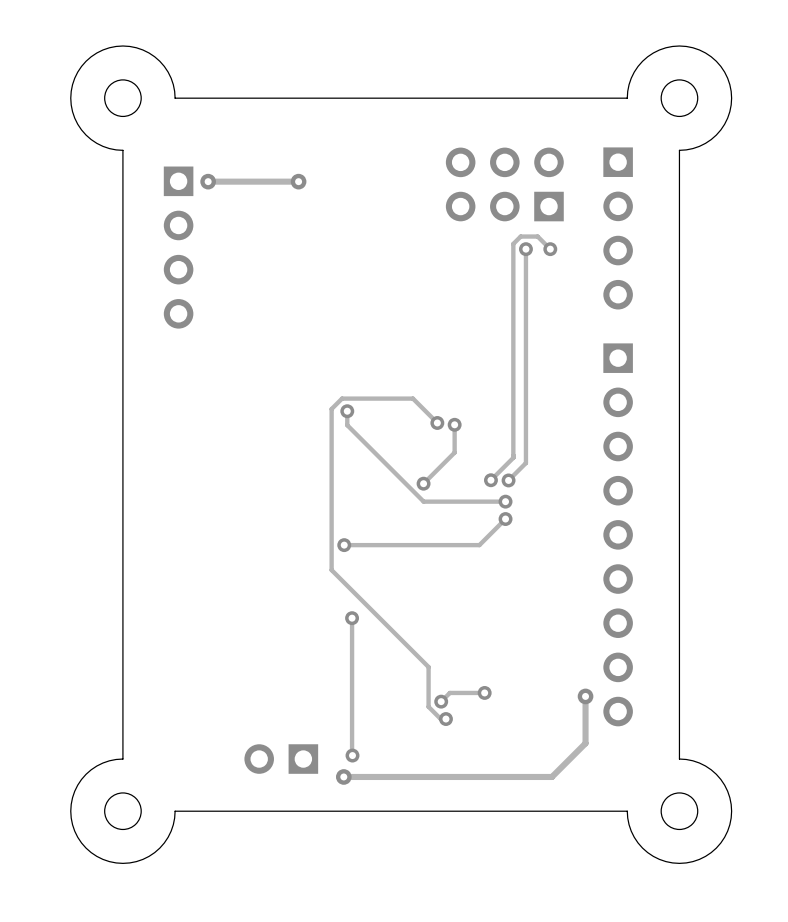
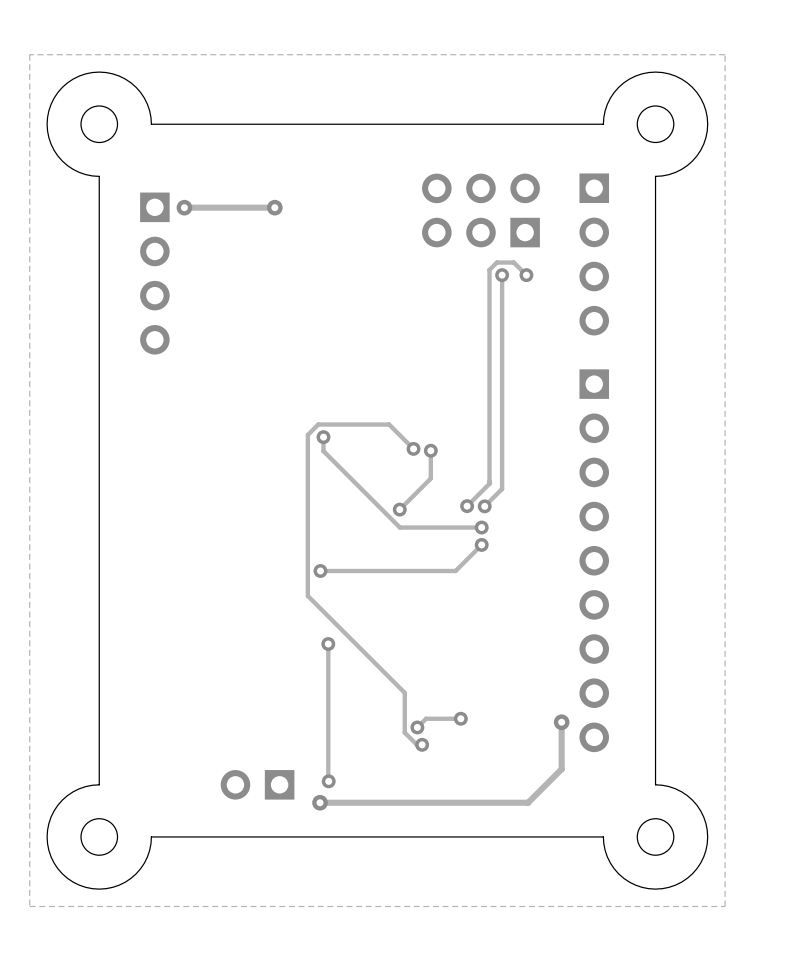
zone outline: none -> (725, 54) (29, 54) (29, 906) (725, 906) (725, 54)

